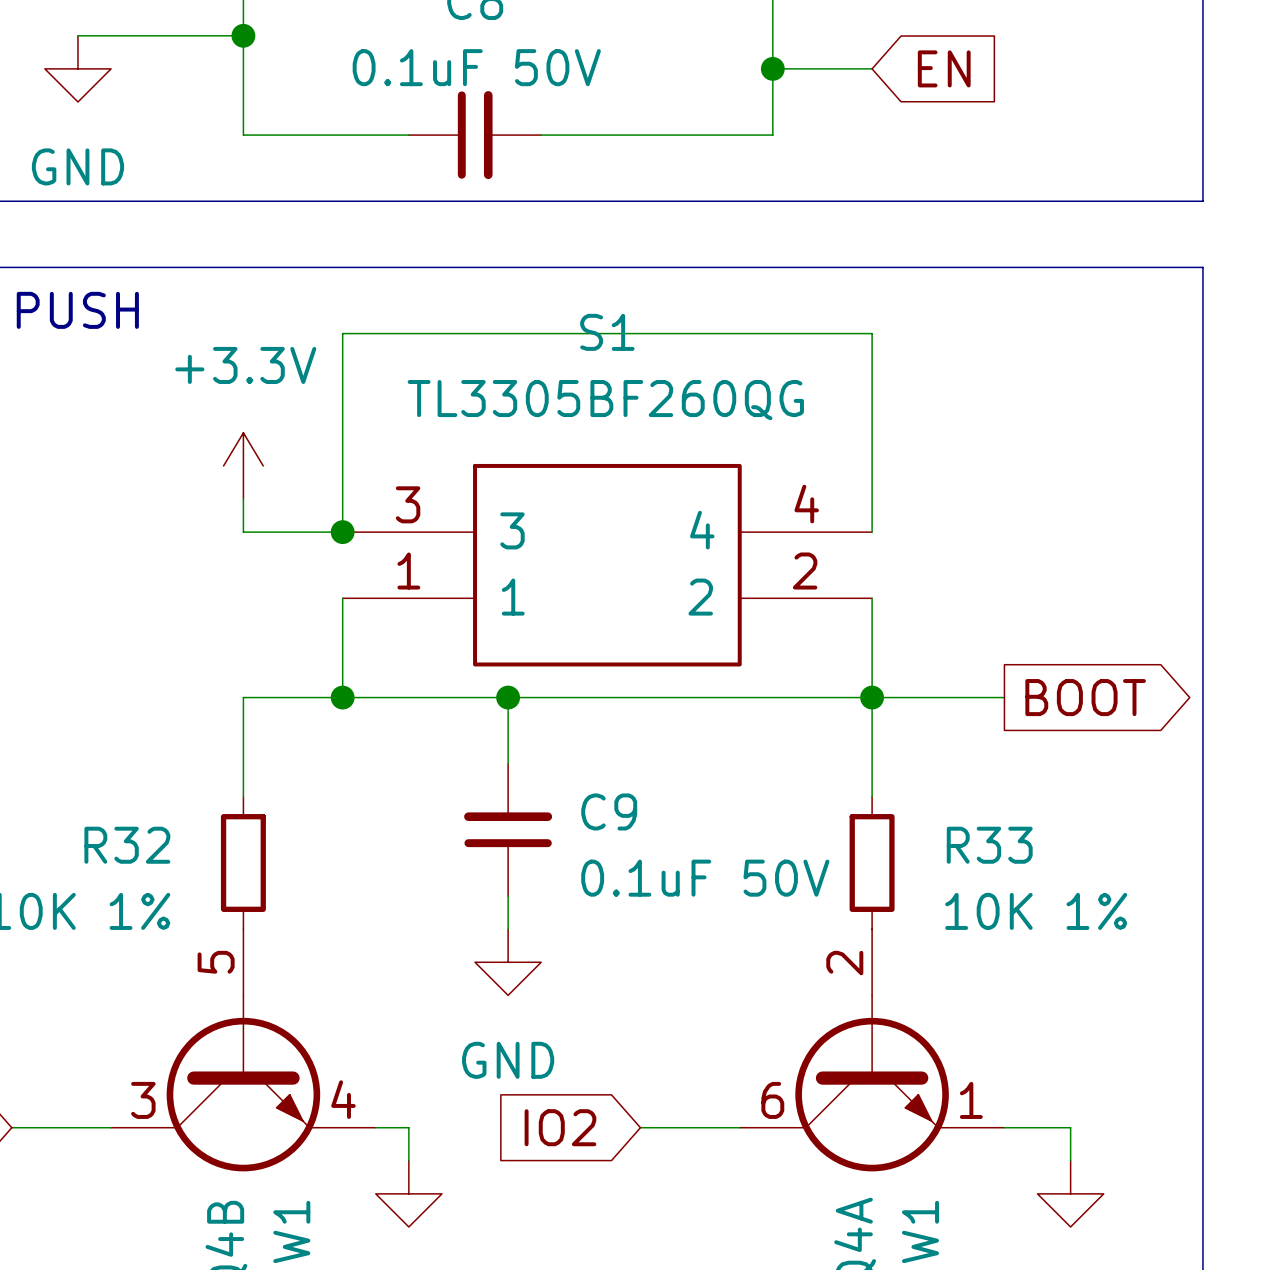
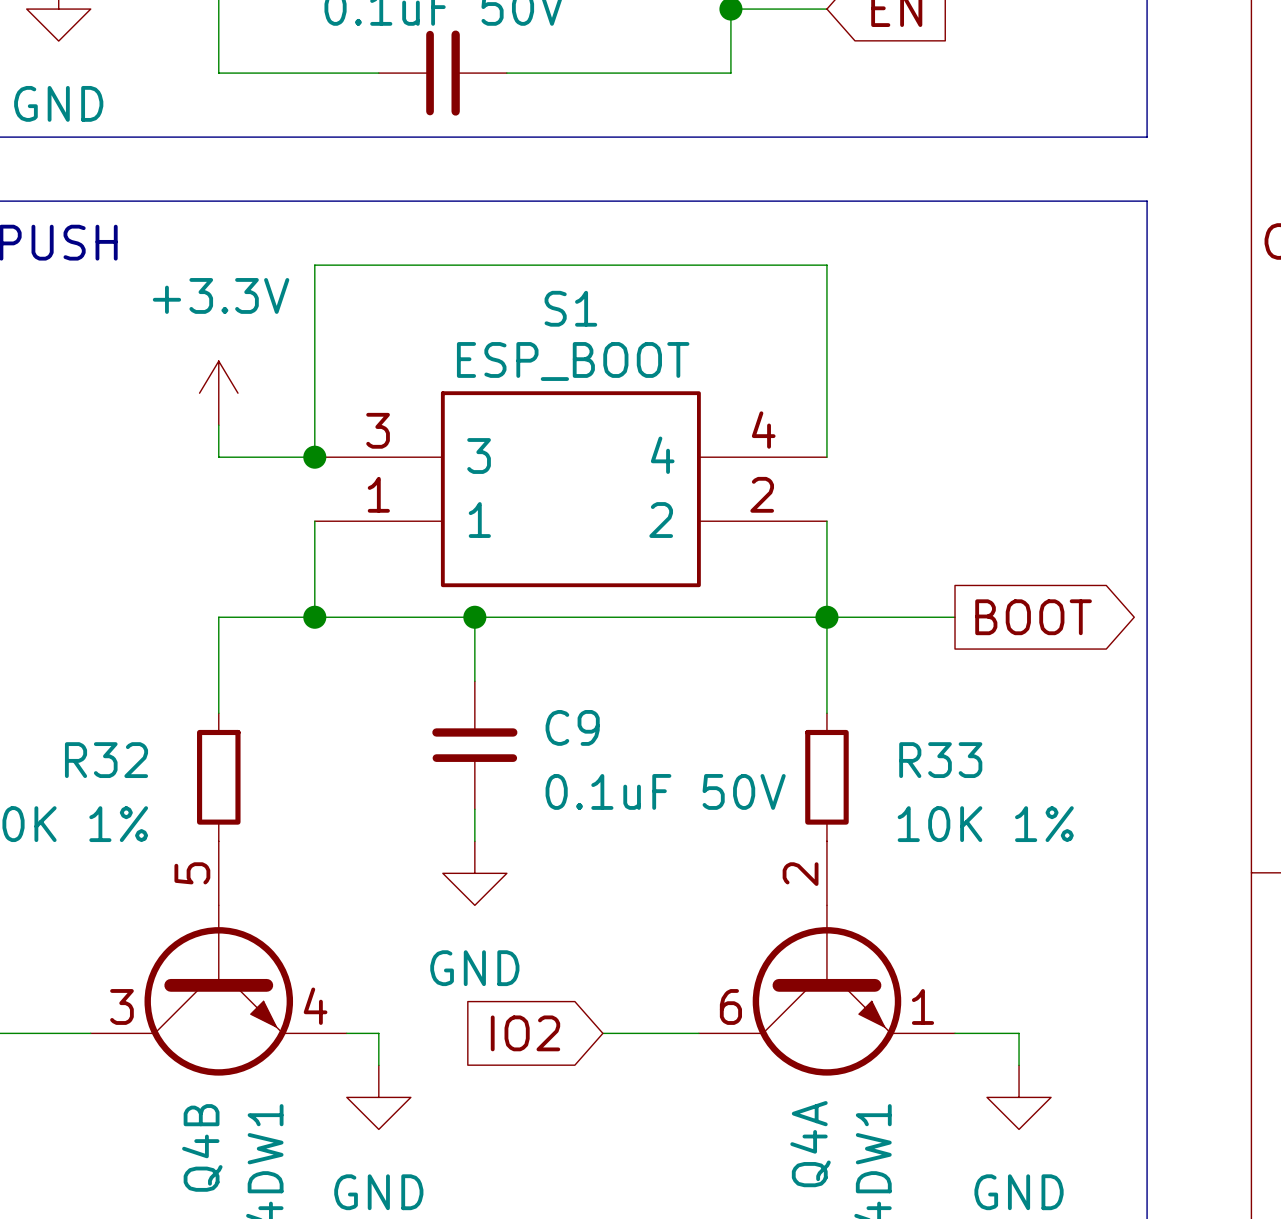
S1 name position: S1 (607, 332) -> S1 (570, 308)
S1 value: TL3305BF260QG (605, 400) -> ESP_BOOT (573, 361)

